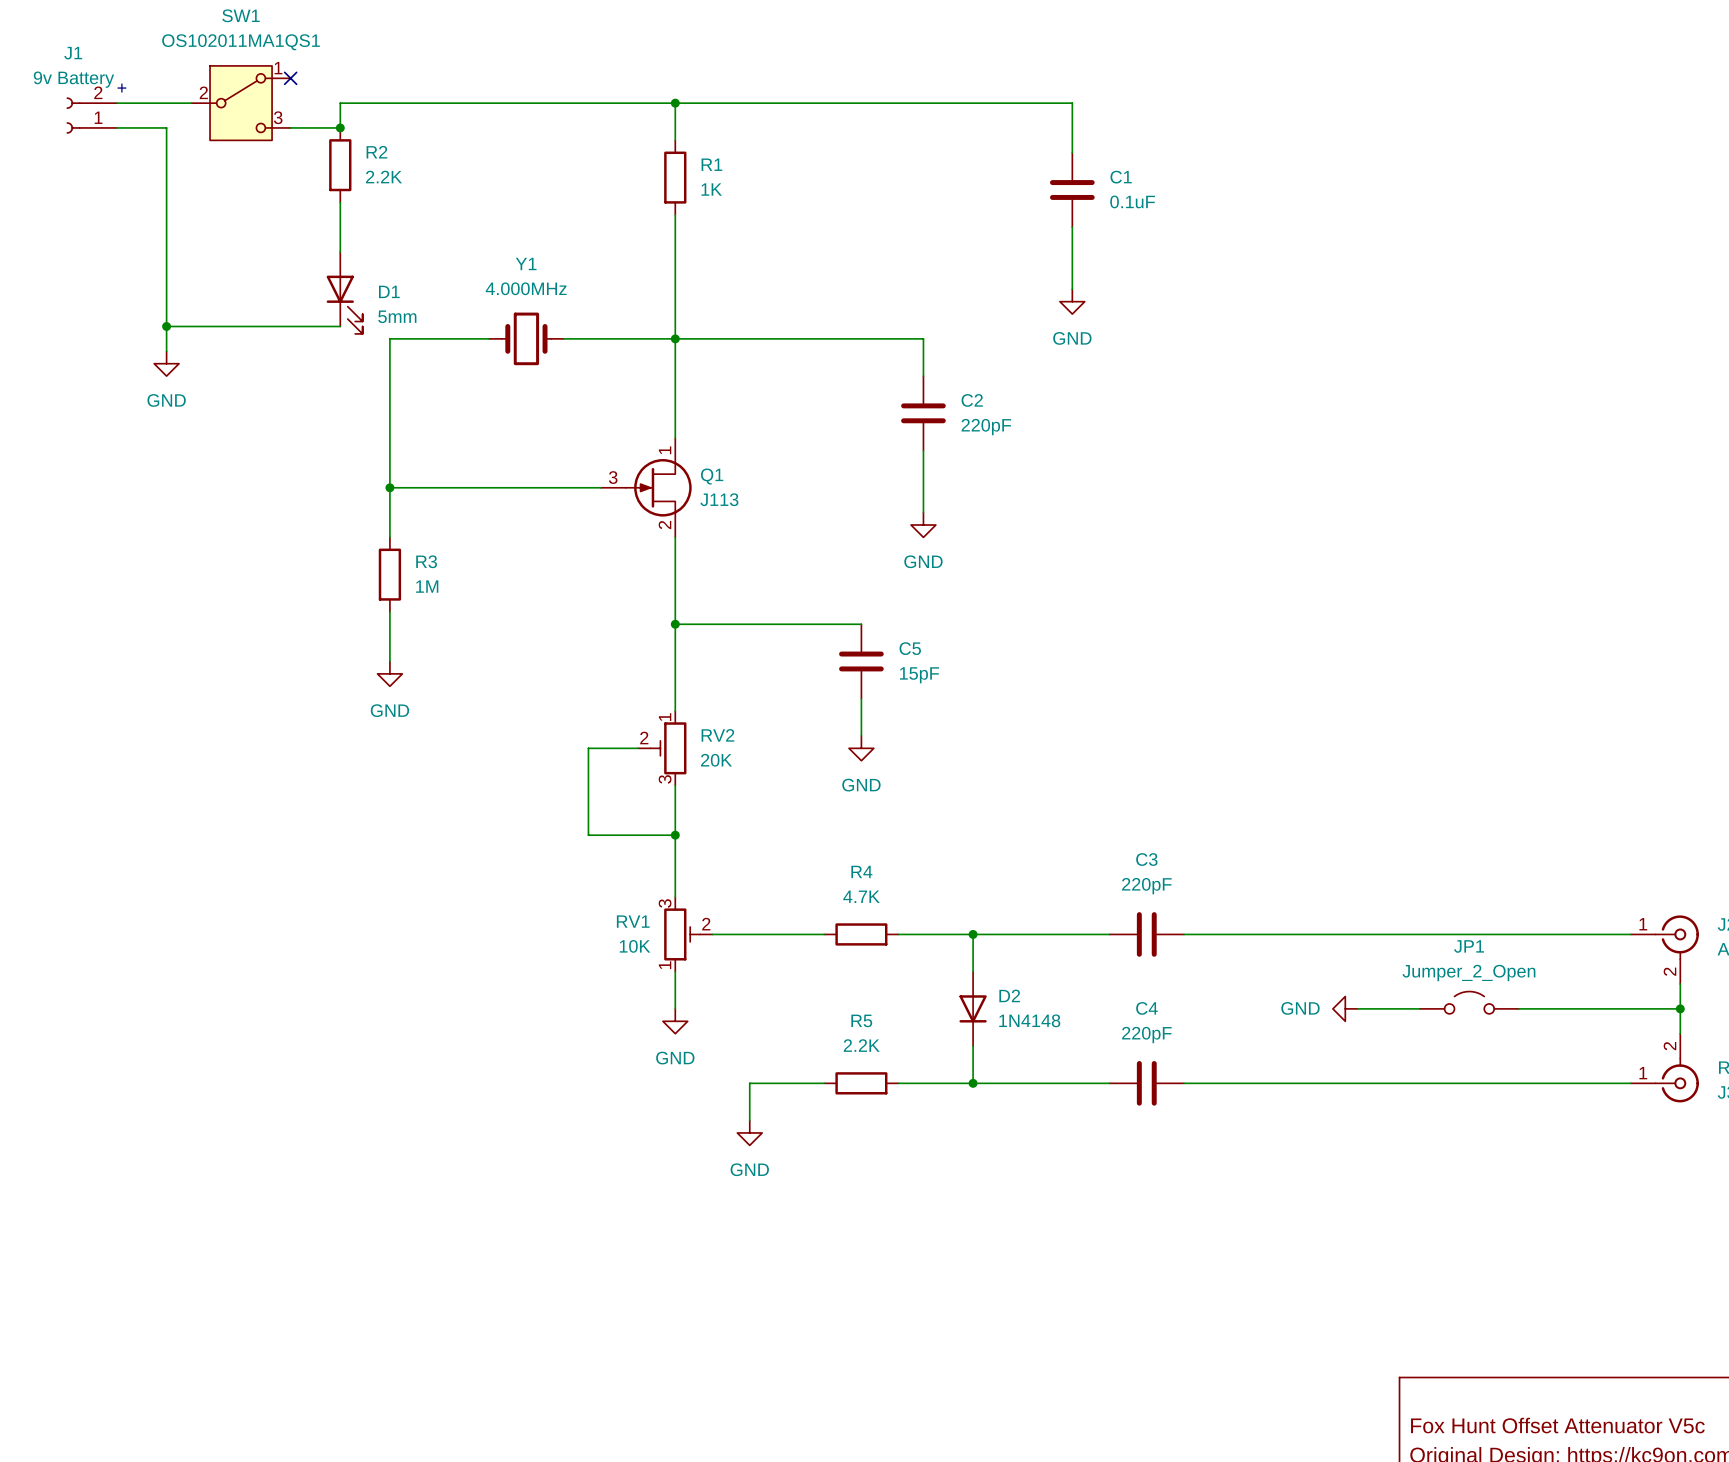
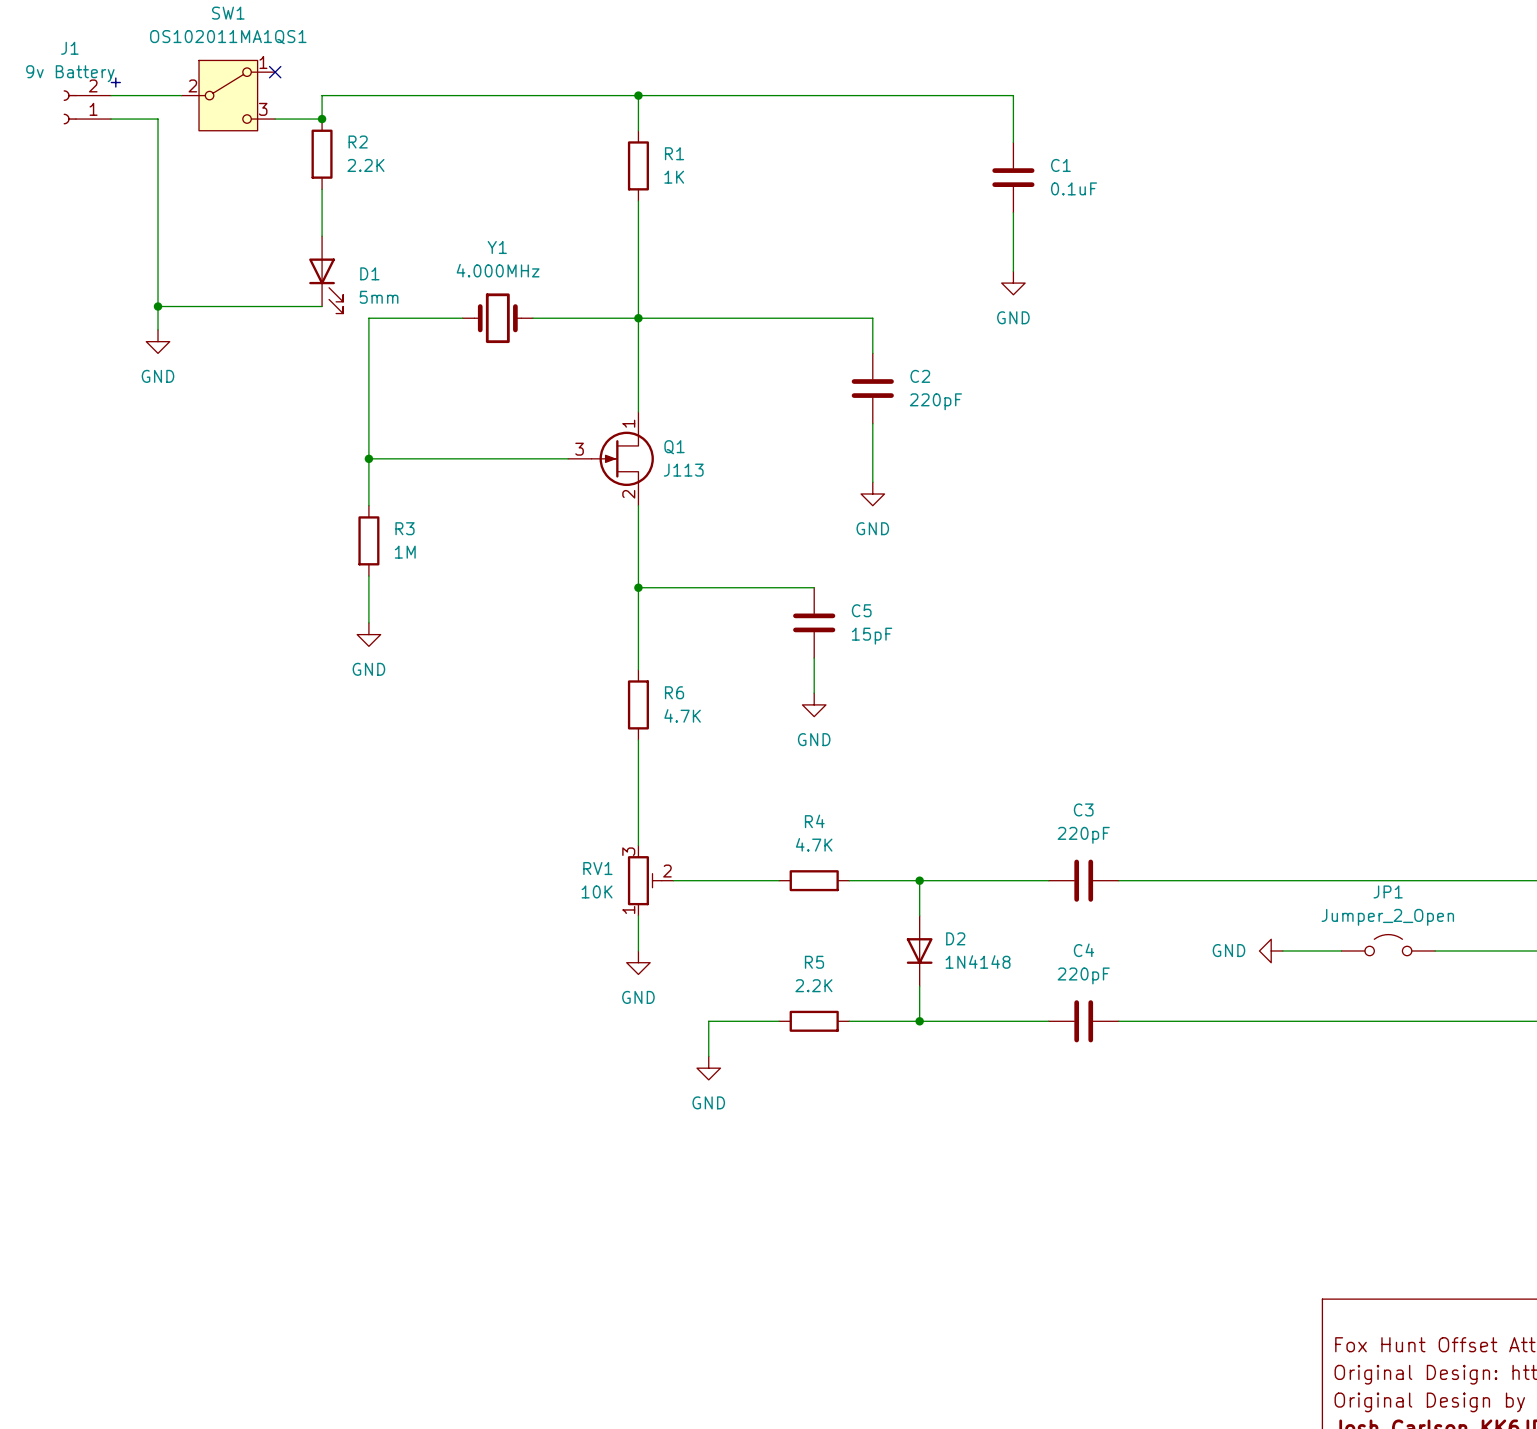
wire: (638, 748) (588, 748) (588, 835) (675, 835) -> none
RV2: 20K (662, 748) -> none
R6: none -> 4.7K (638, 704)
junction: (675, 835) -> none

